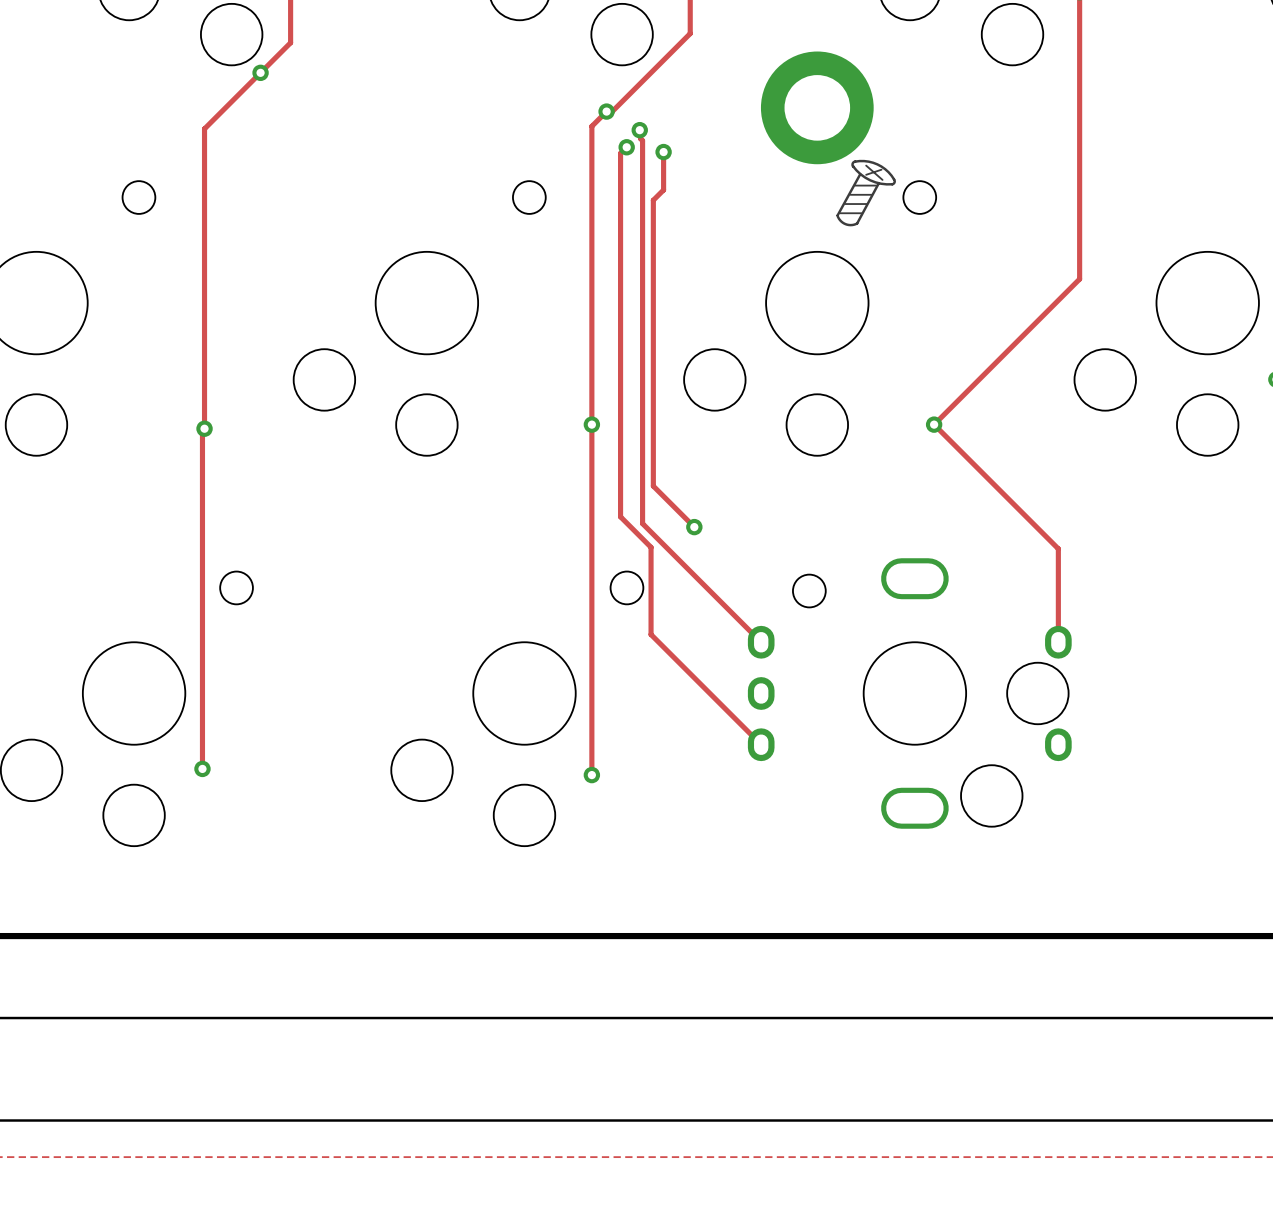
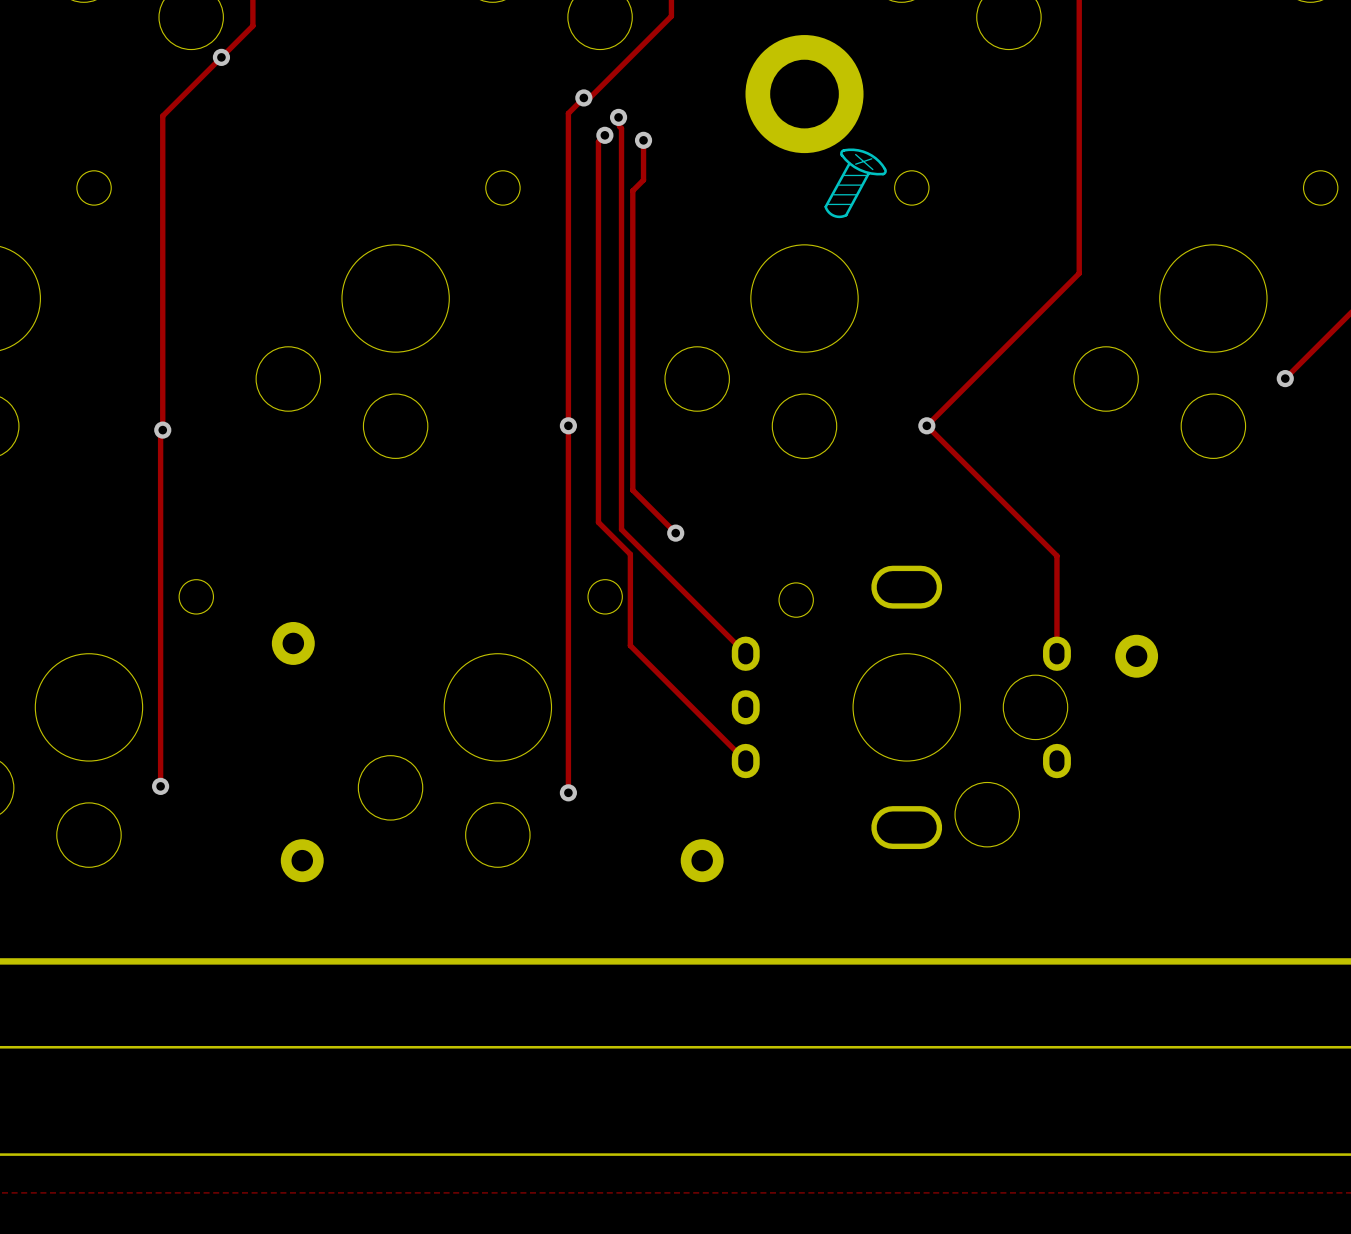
part: none -> (293, 643)
part: none -> (1136, 656)
part: none -> (302, 860)
part: none -> (702, 860)

